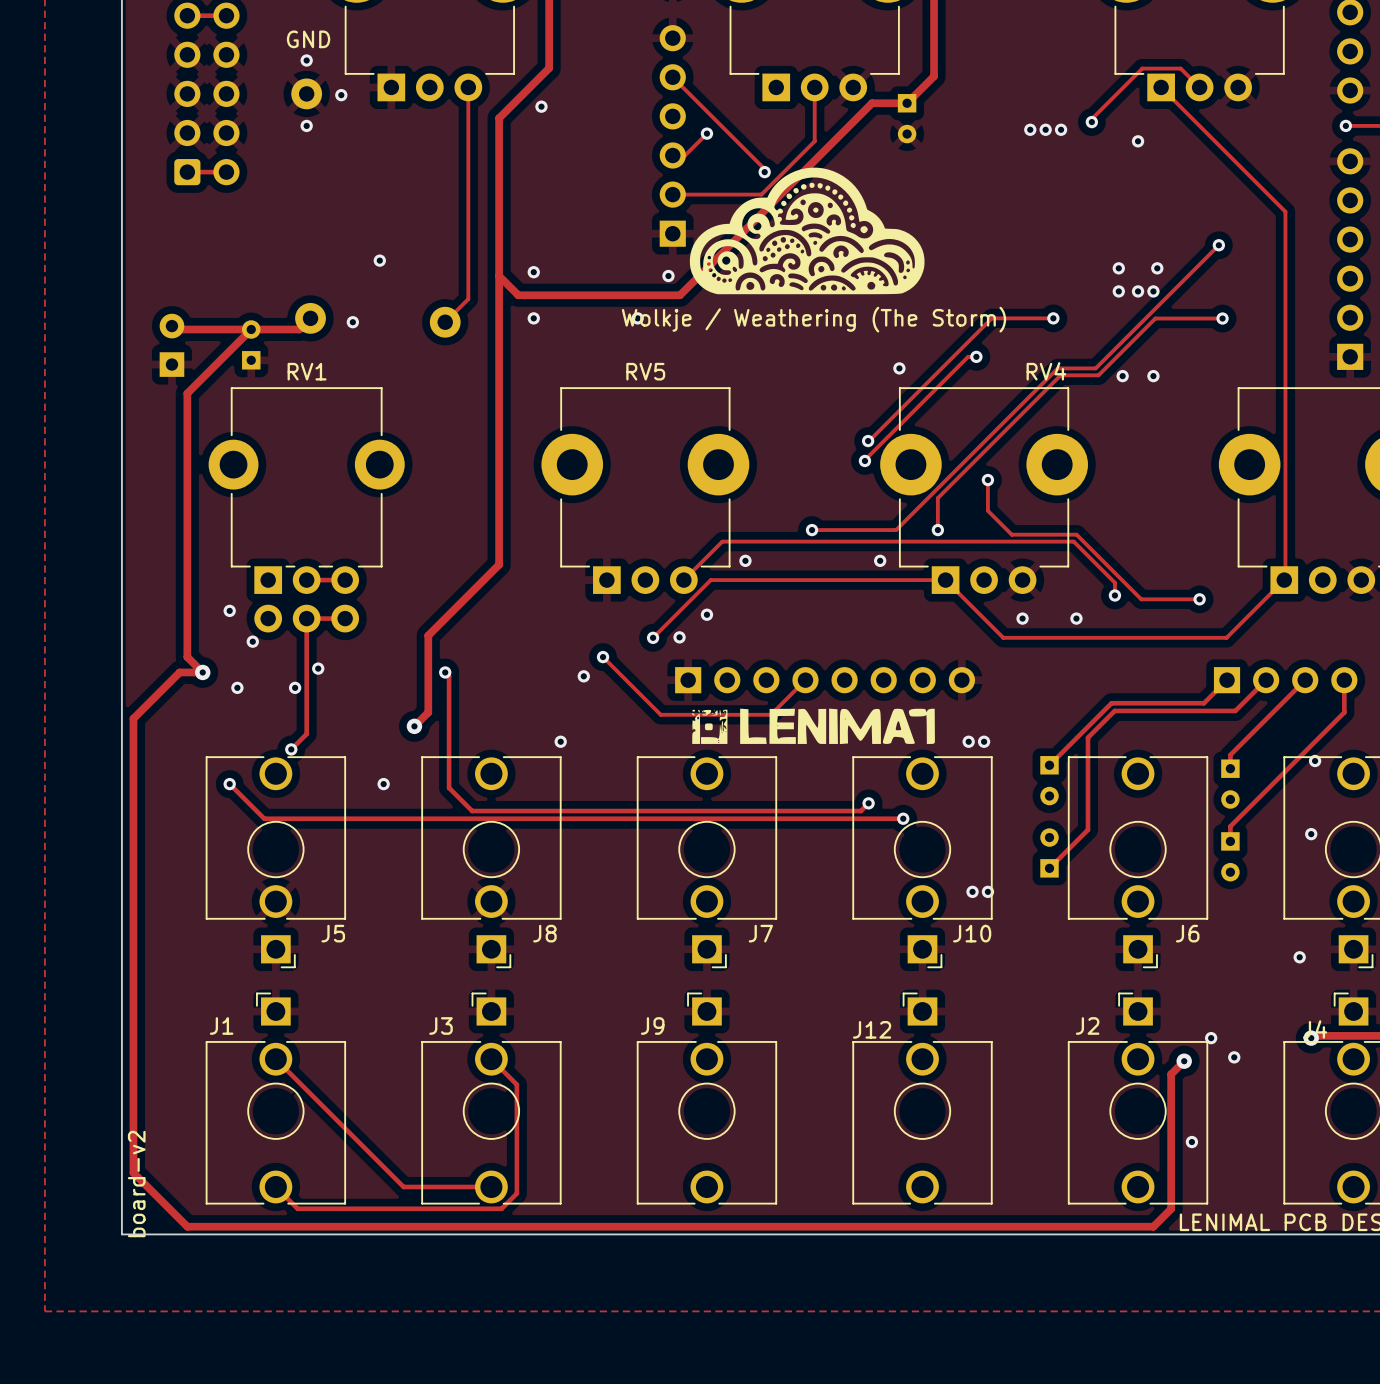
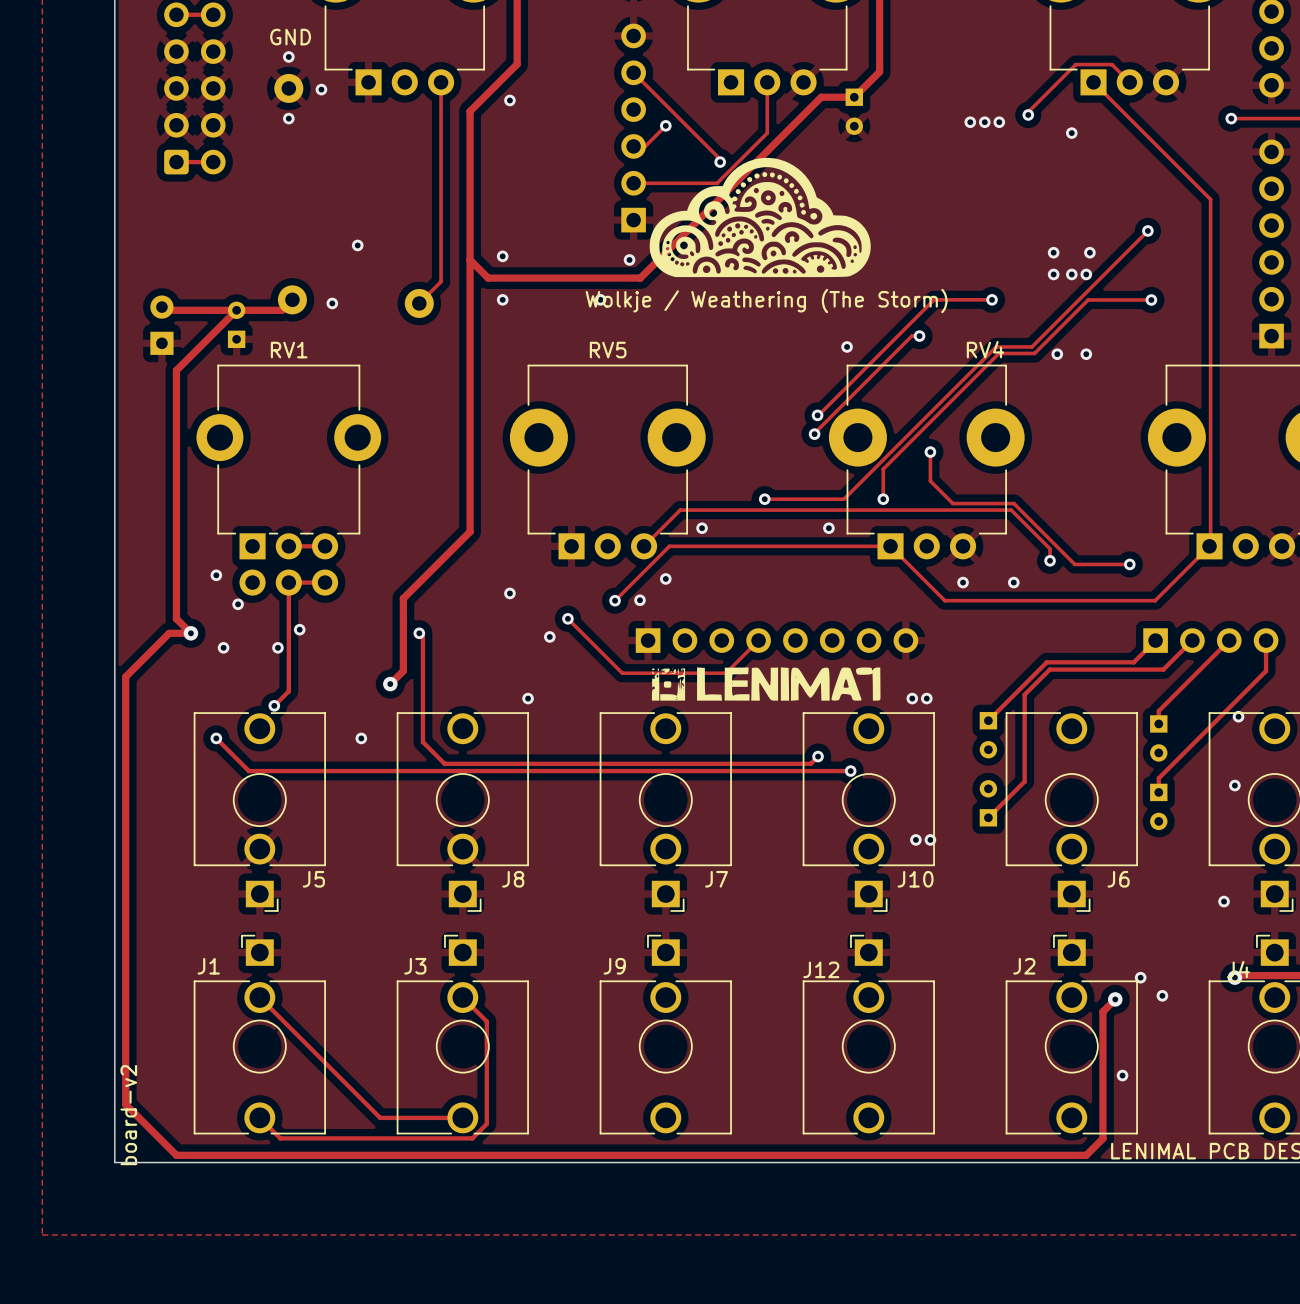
track: none -> (1231, 118) (1267, 118)
via position: (1345, 125) -> (1231, 118)
via: none -> (509, 593)

